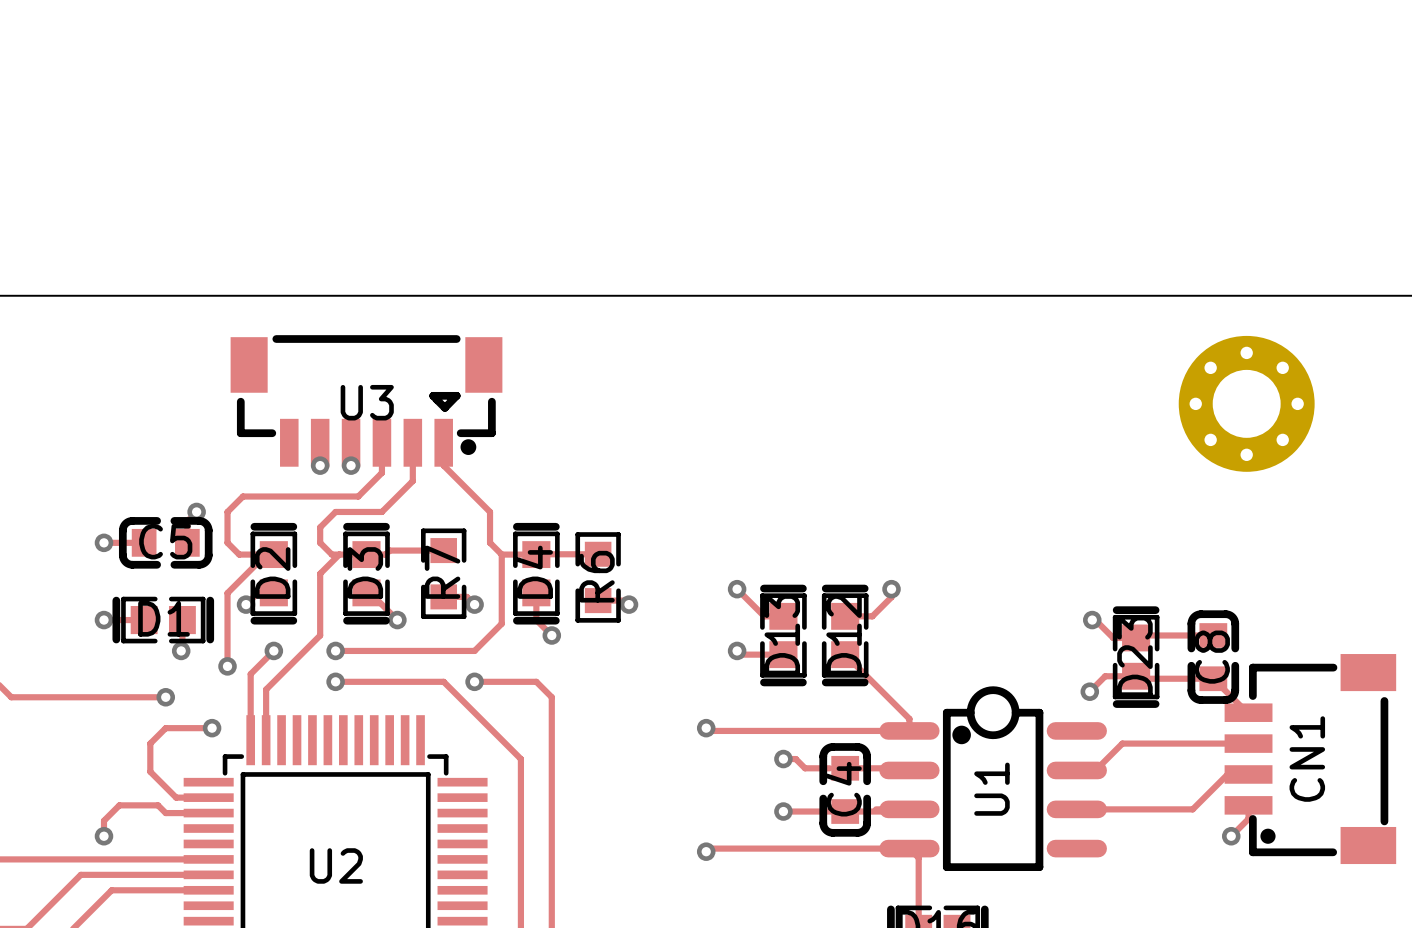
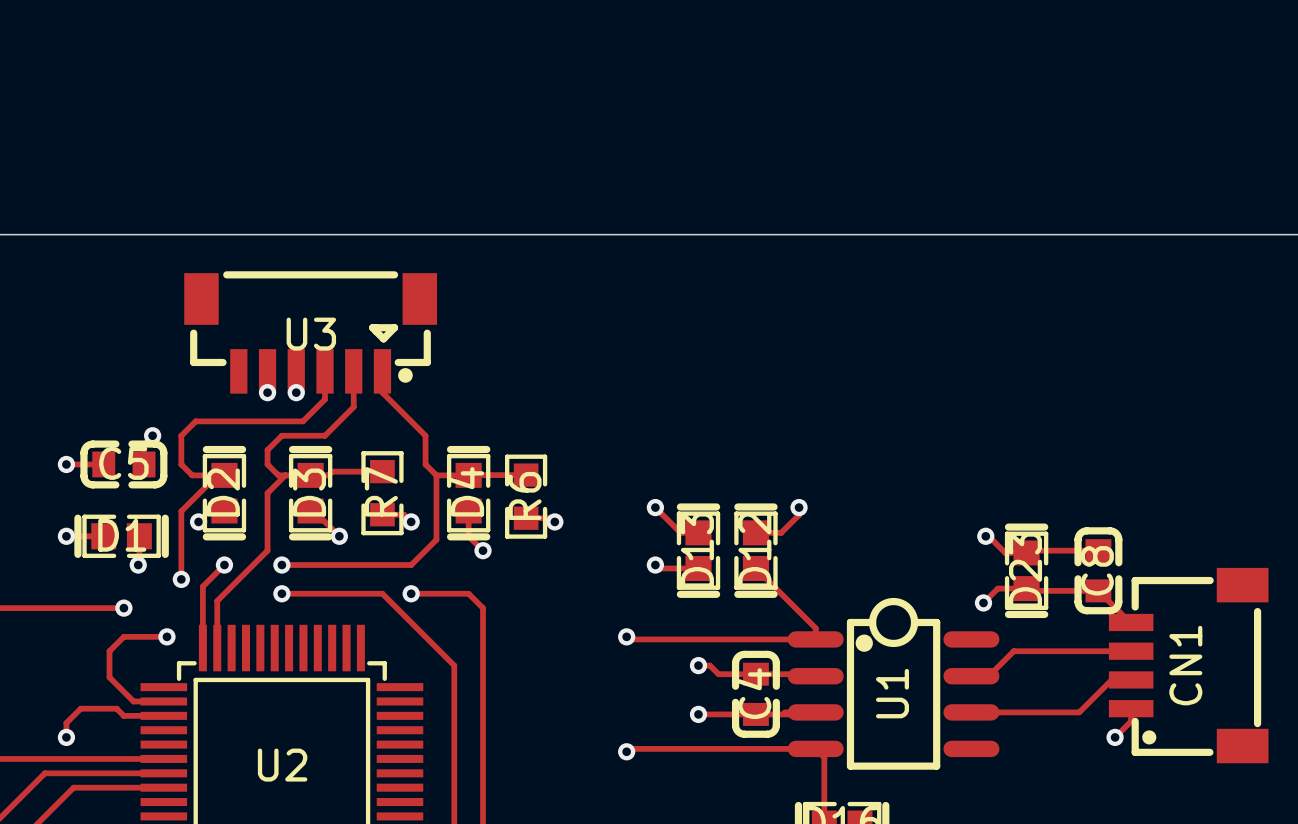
part: (1246, 403) -> none

